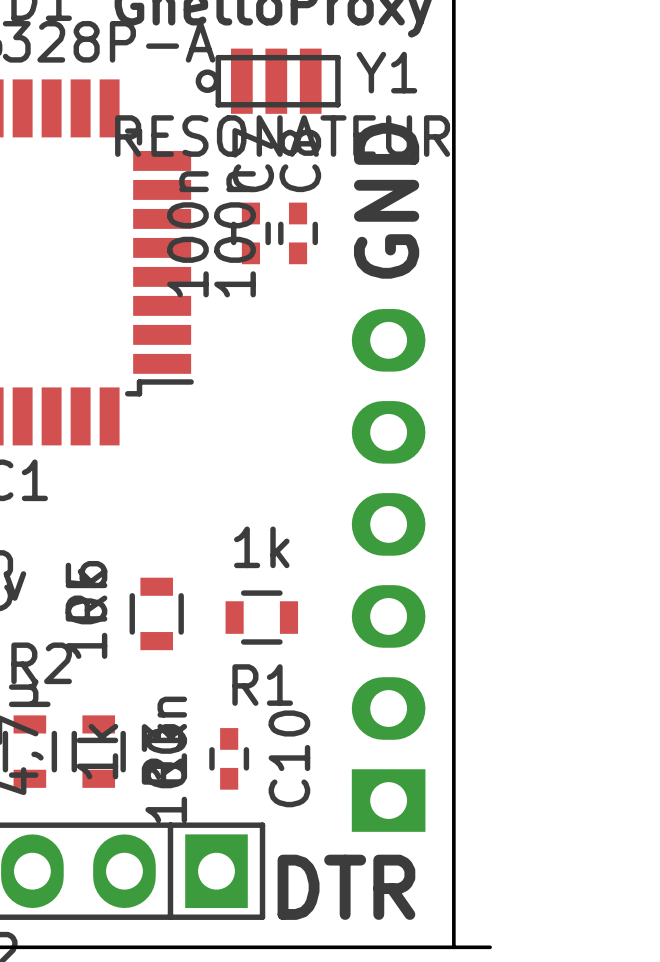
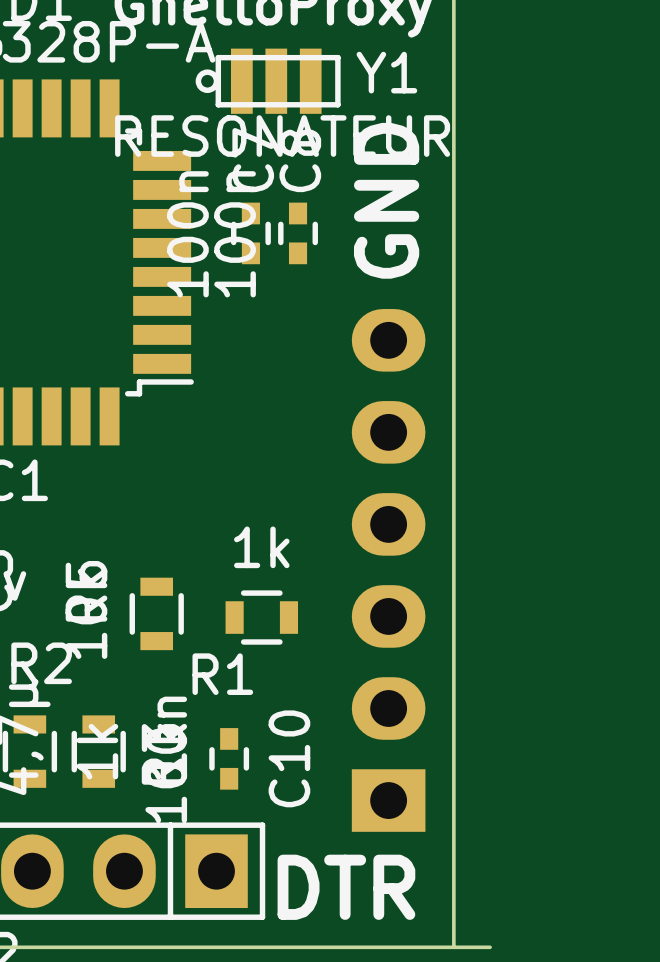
R1 name position: R1 (262, 685) -> R1 (222, 674)

